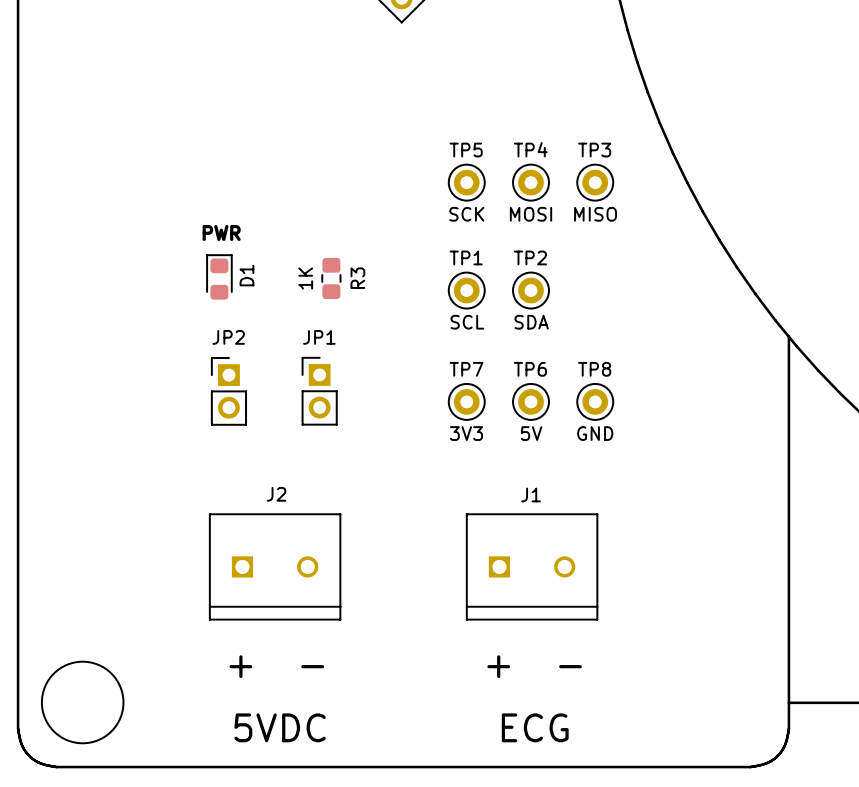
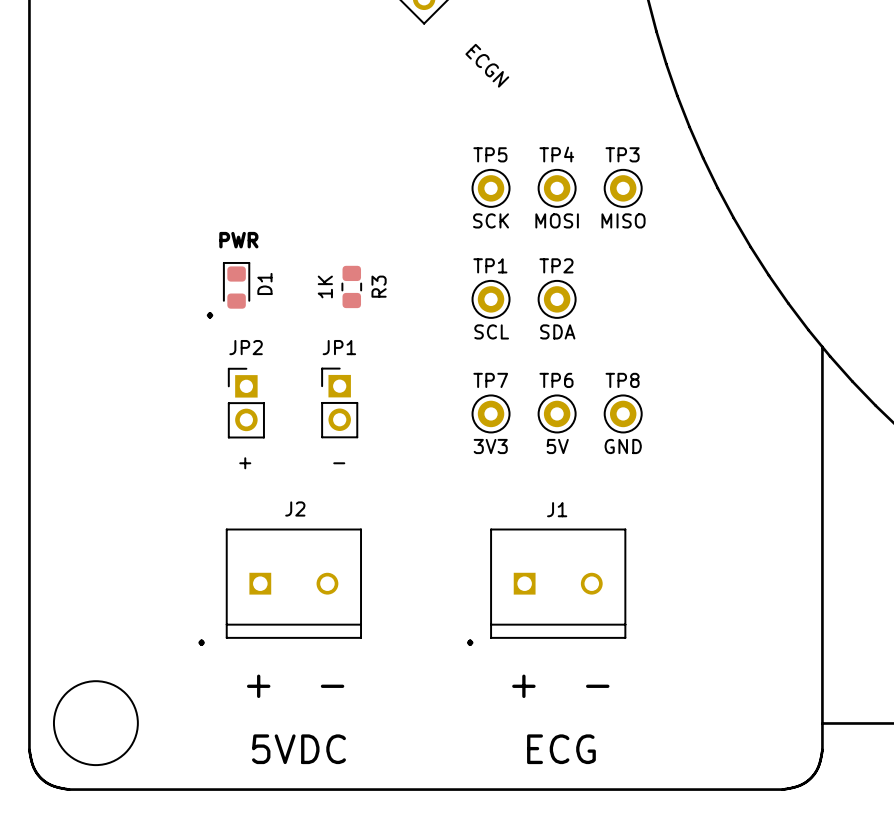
text: none -> ECGN (487, 65)
text: none -> . (210, 315)
text: none -> + (245, 463)
text: none -> - (339, 463)
text: none -> . (201, 642)
text: none -> . (470, 642)

